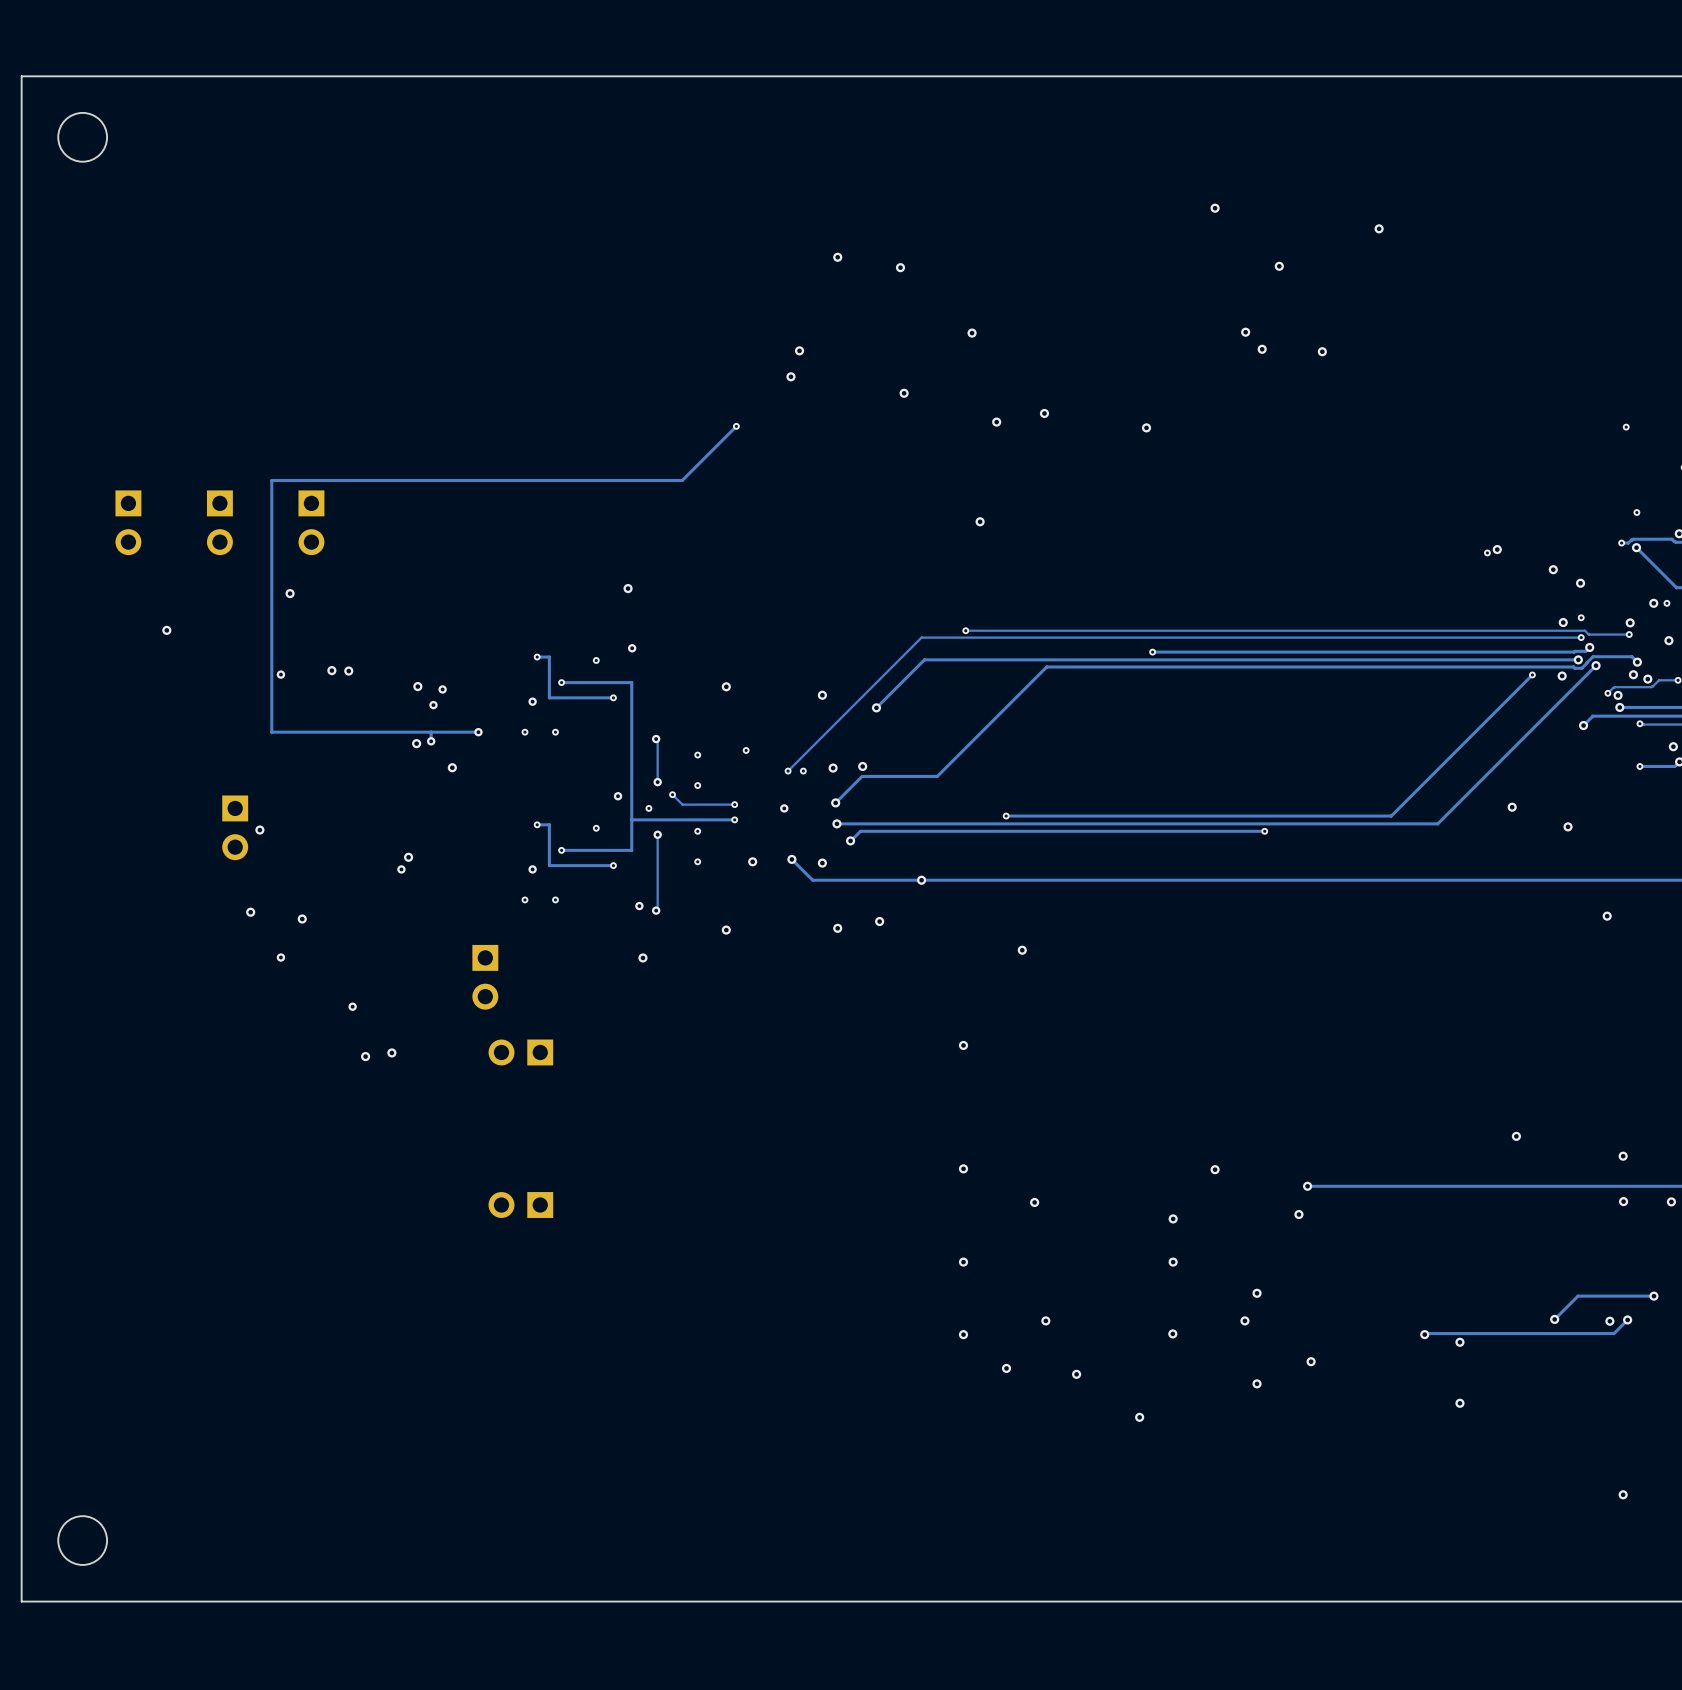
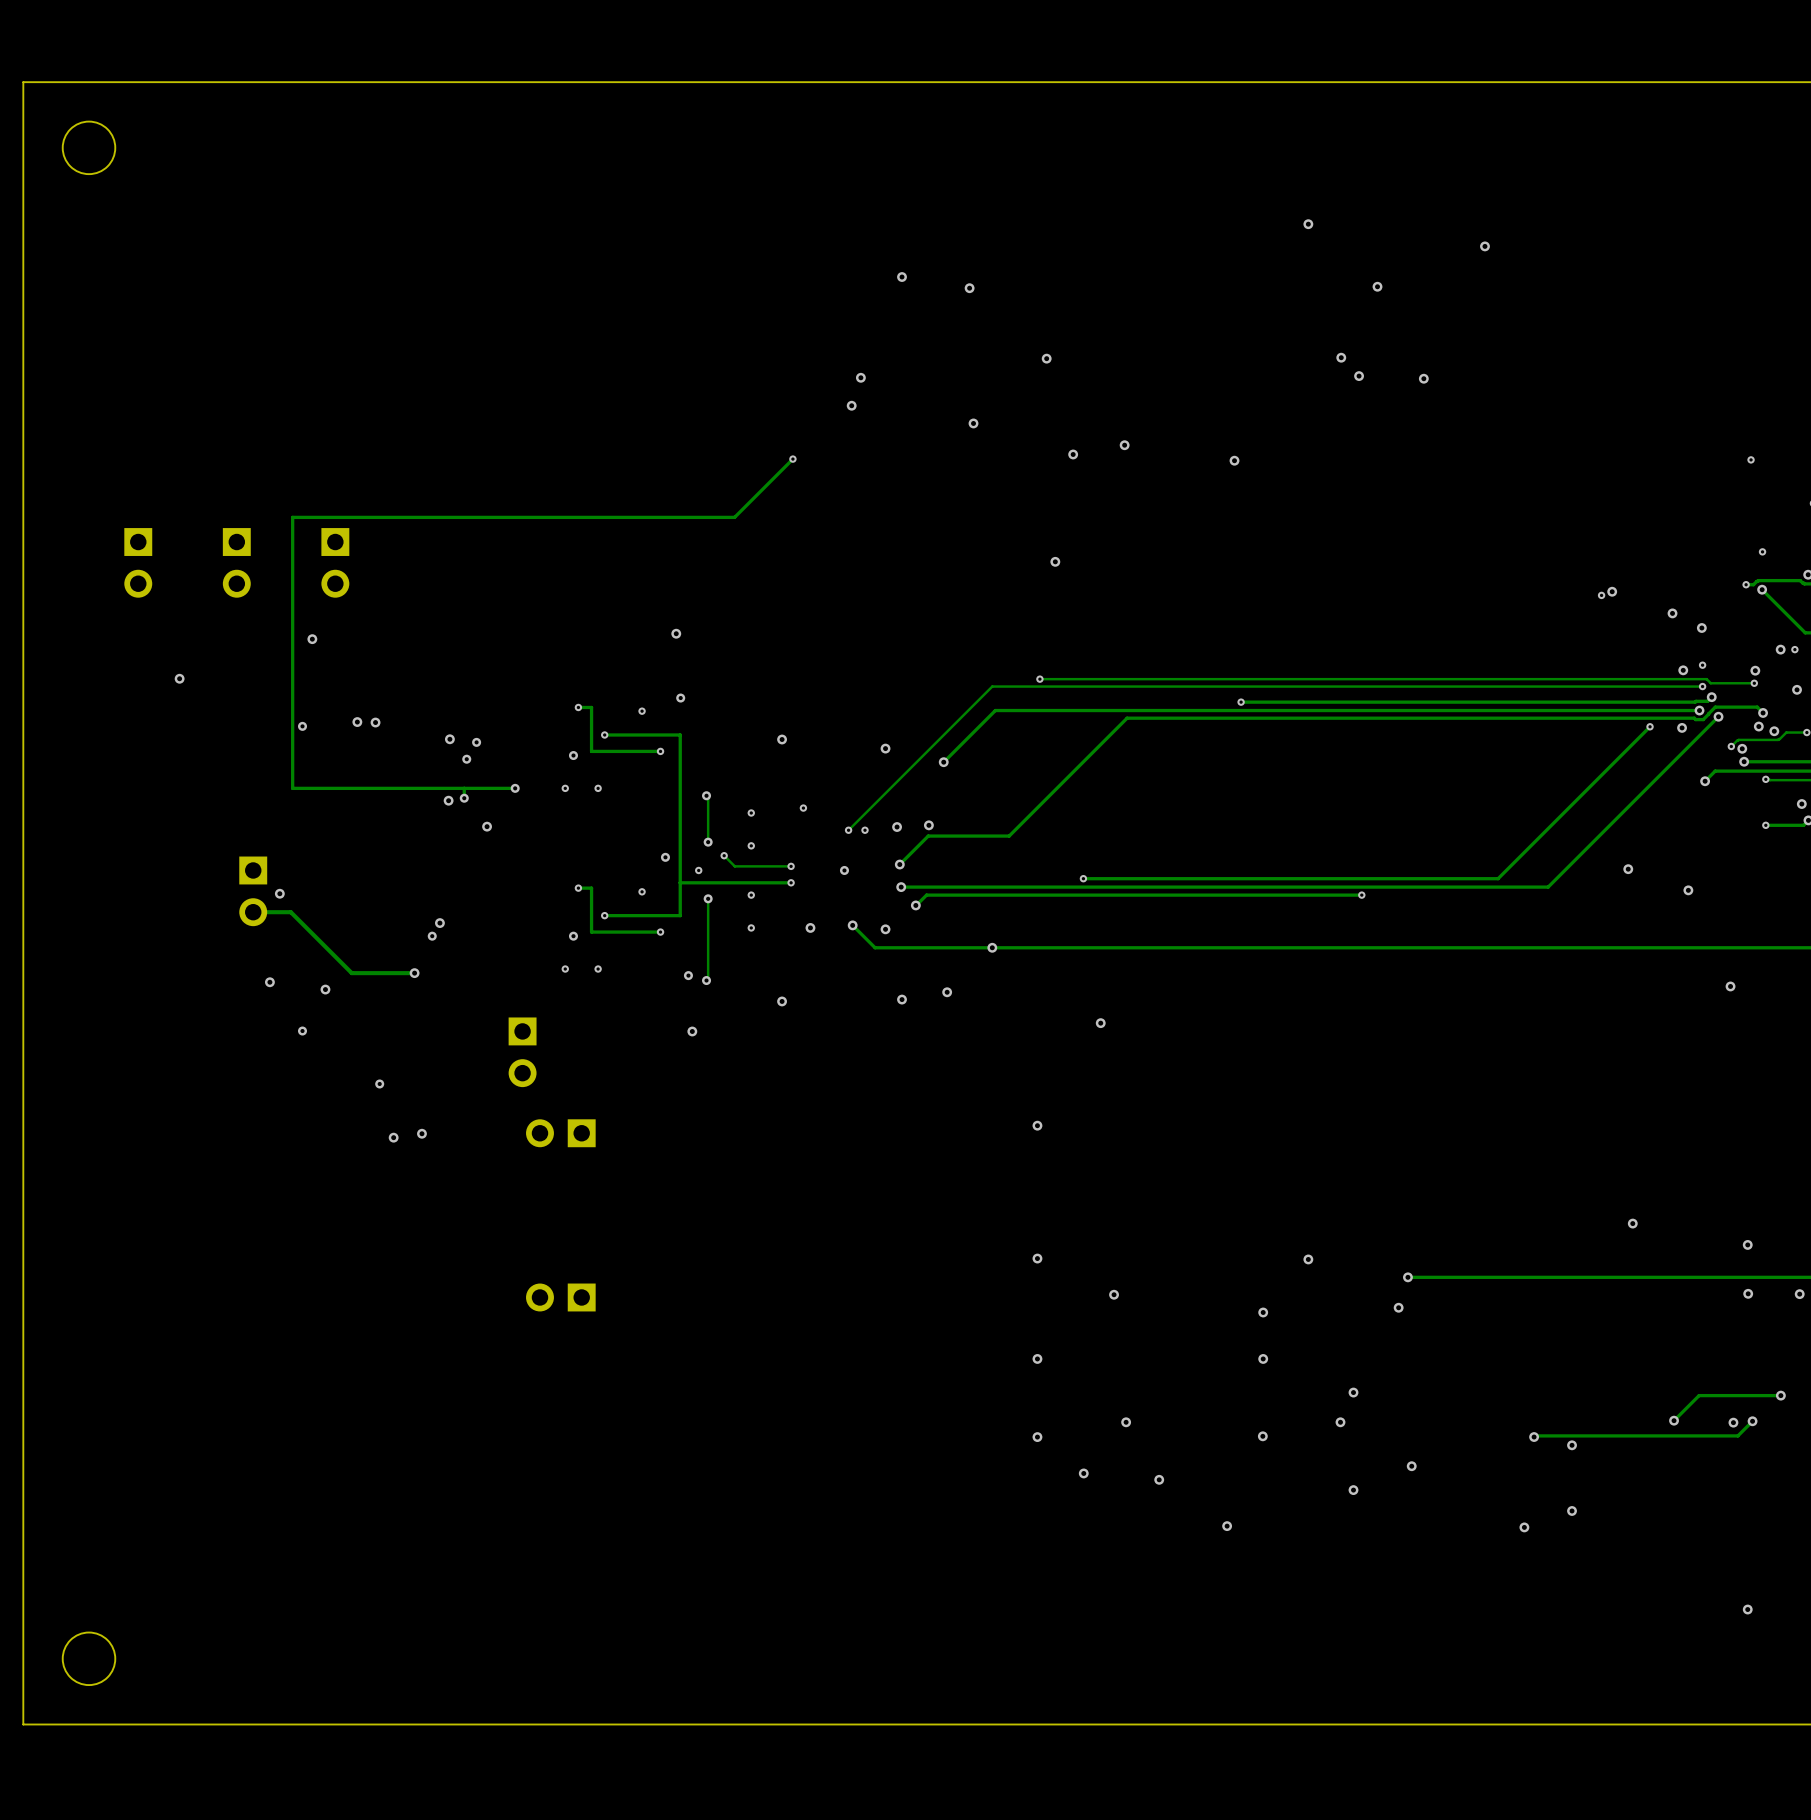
track: none -> (253, 912) (290, 912) (351, 973) (414, 973)
via: none -> (414, 973)
via: none -> (1524, 1527)

